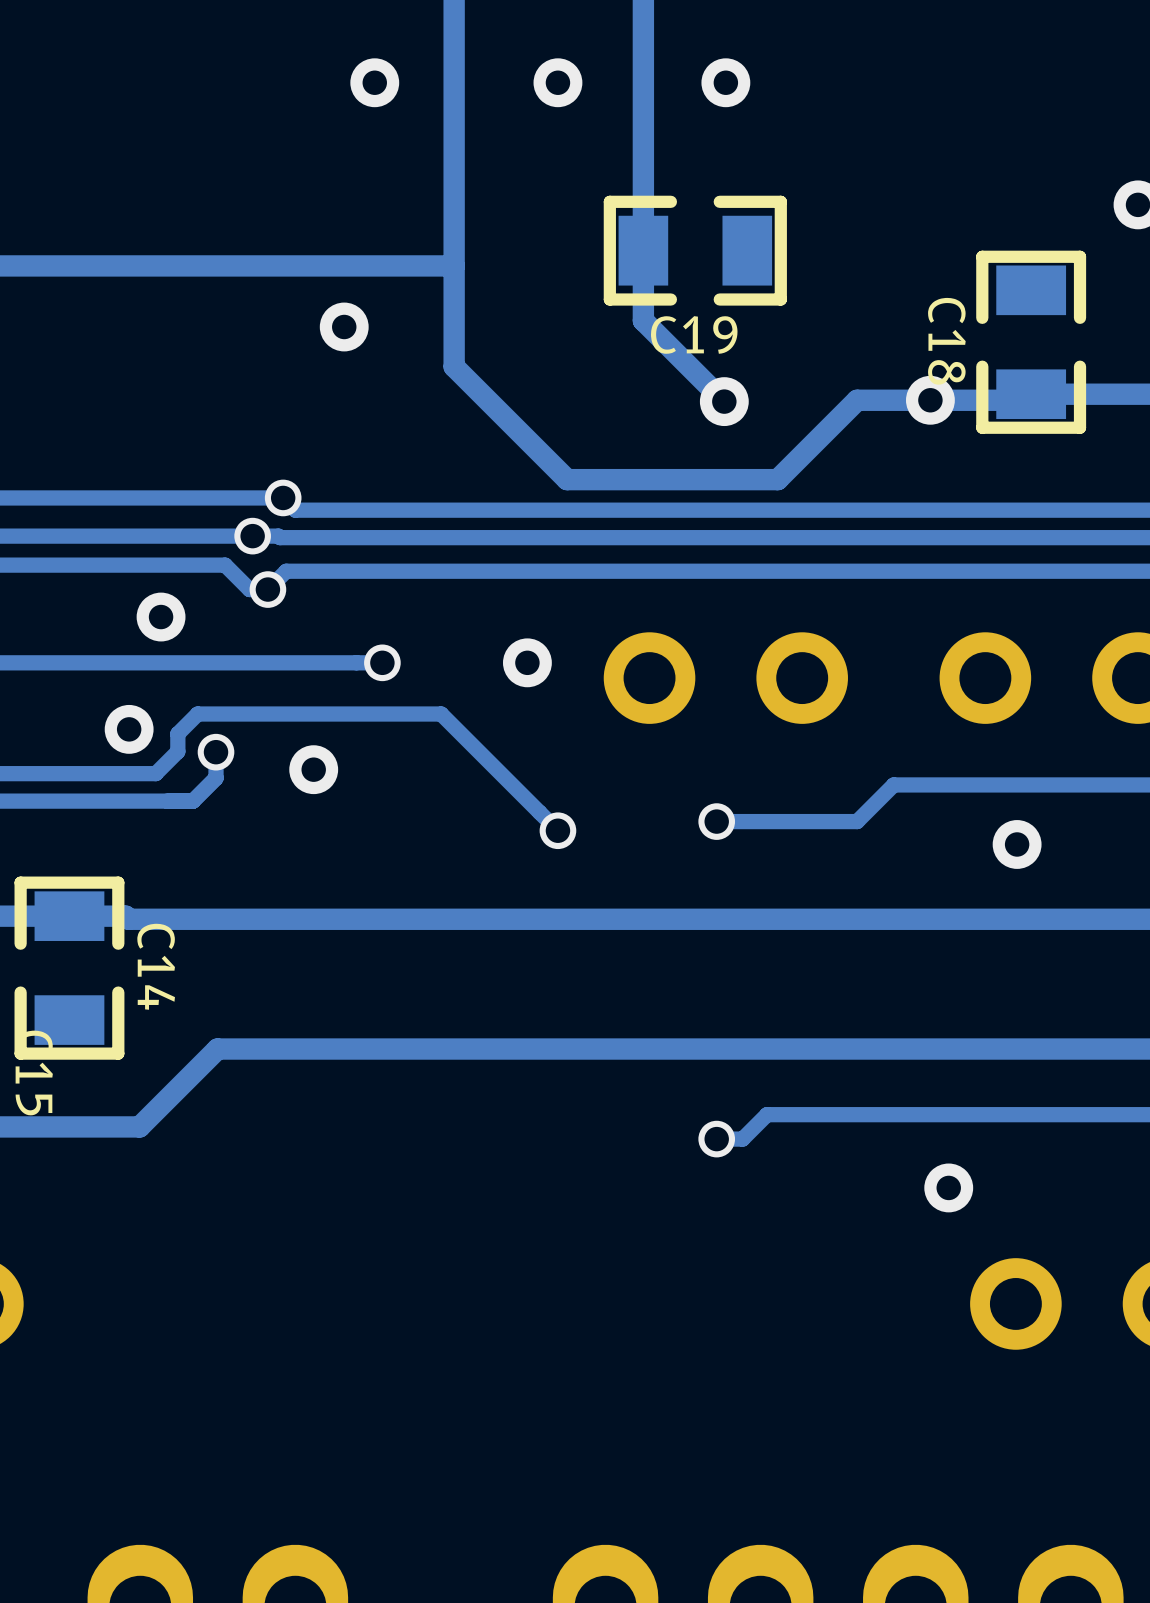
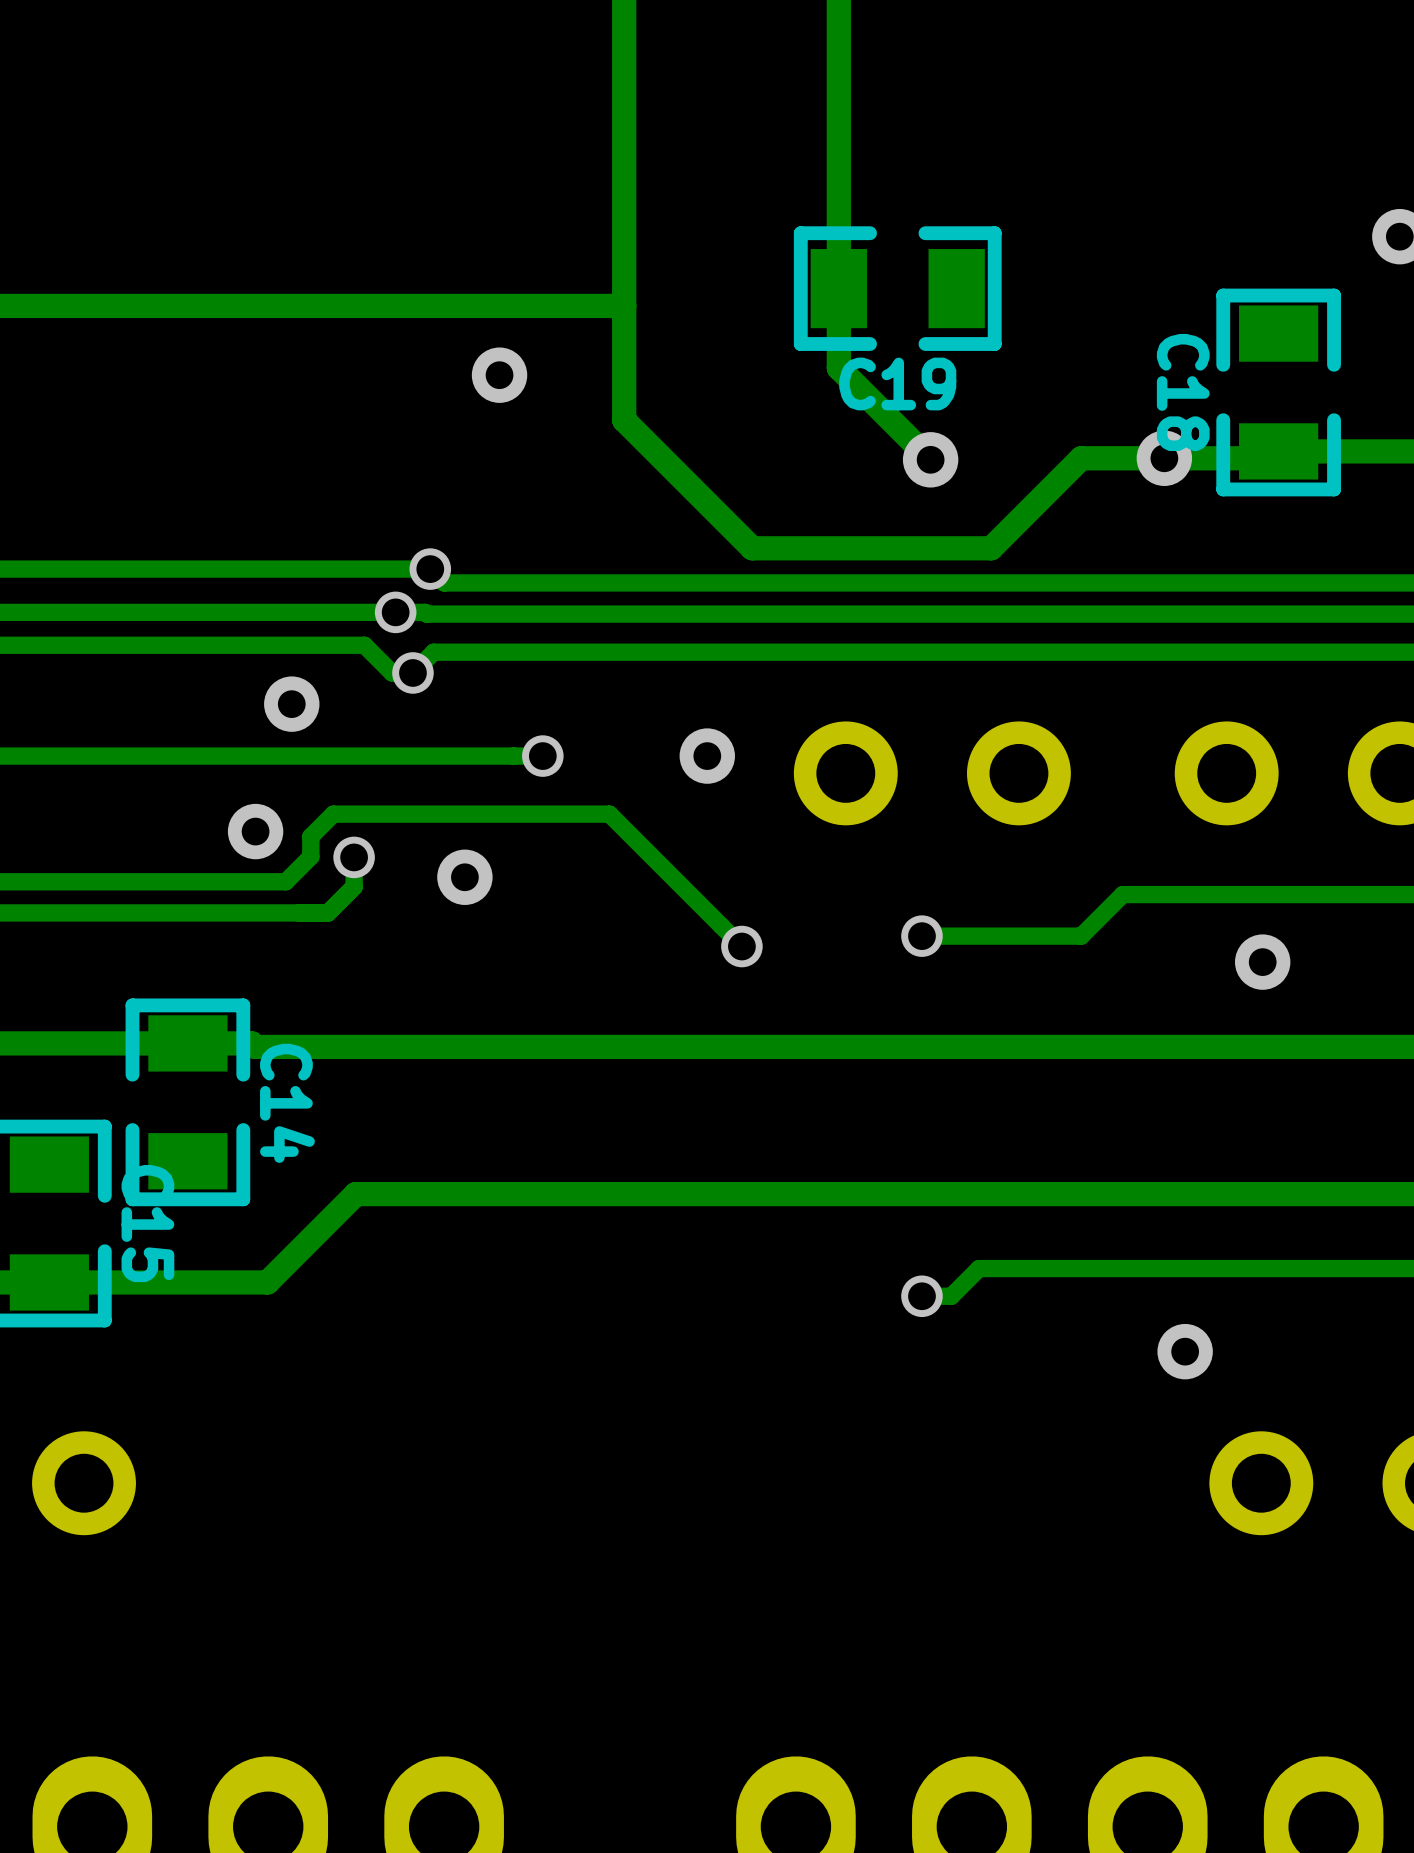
via: (374, 82) -> none
via: (557, 82) -> none
via: (725, 82) -> none

